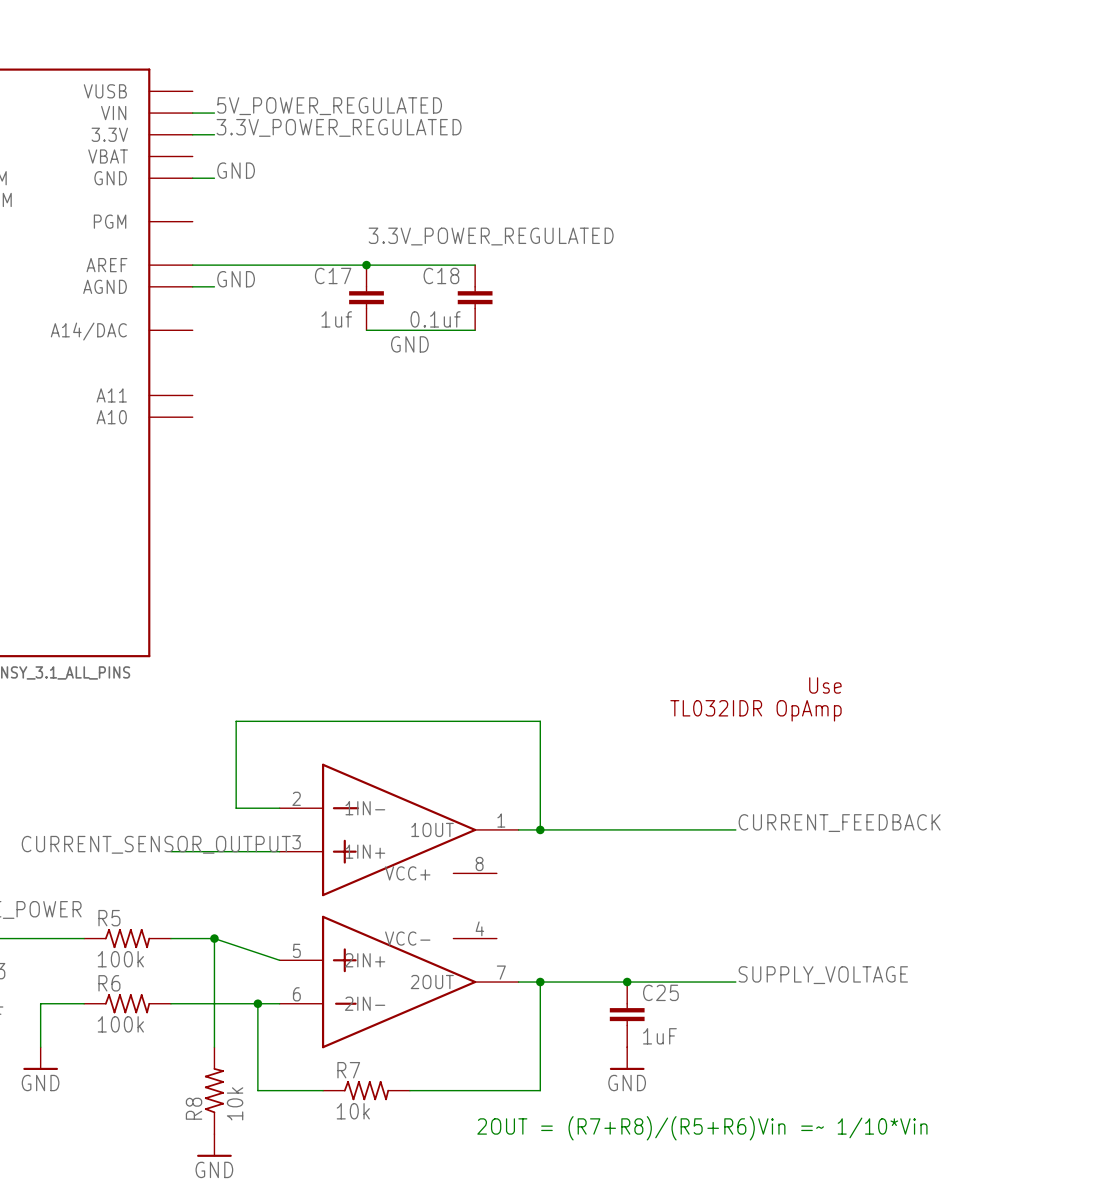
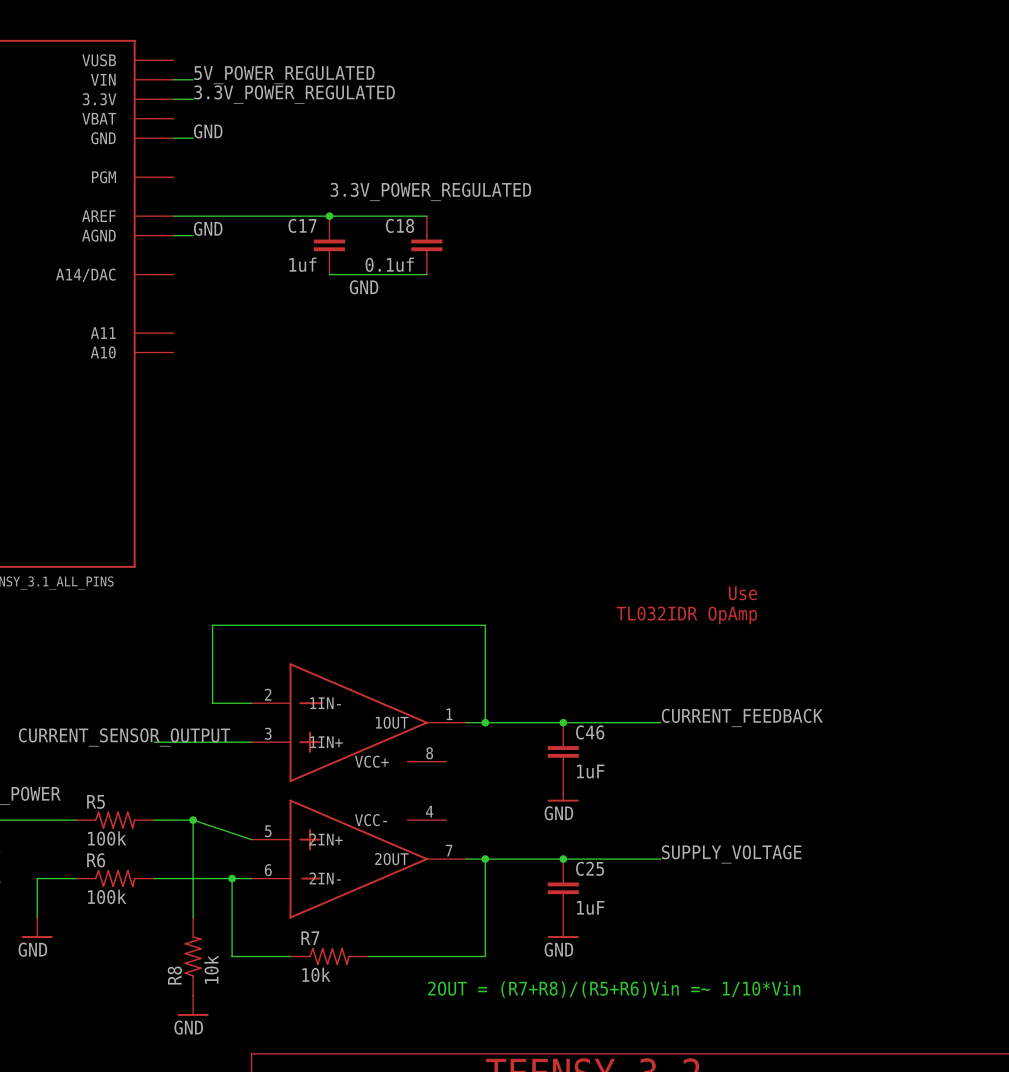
junction: none -> (563, 722)
C46: none -> 1uF (563, 751)
power symbol: none -> GND (563, 791)

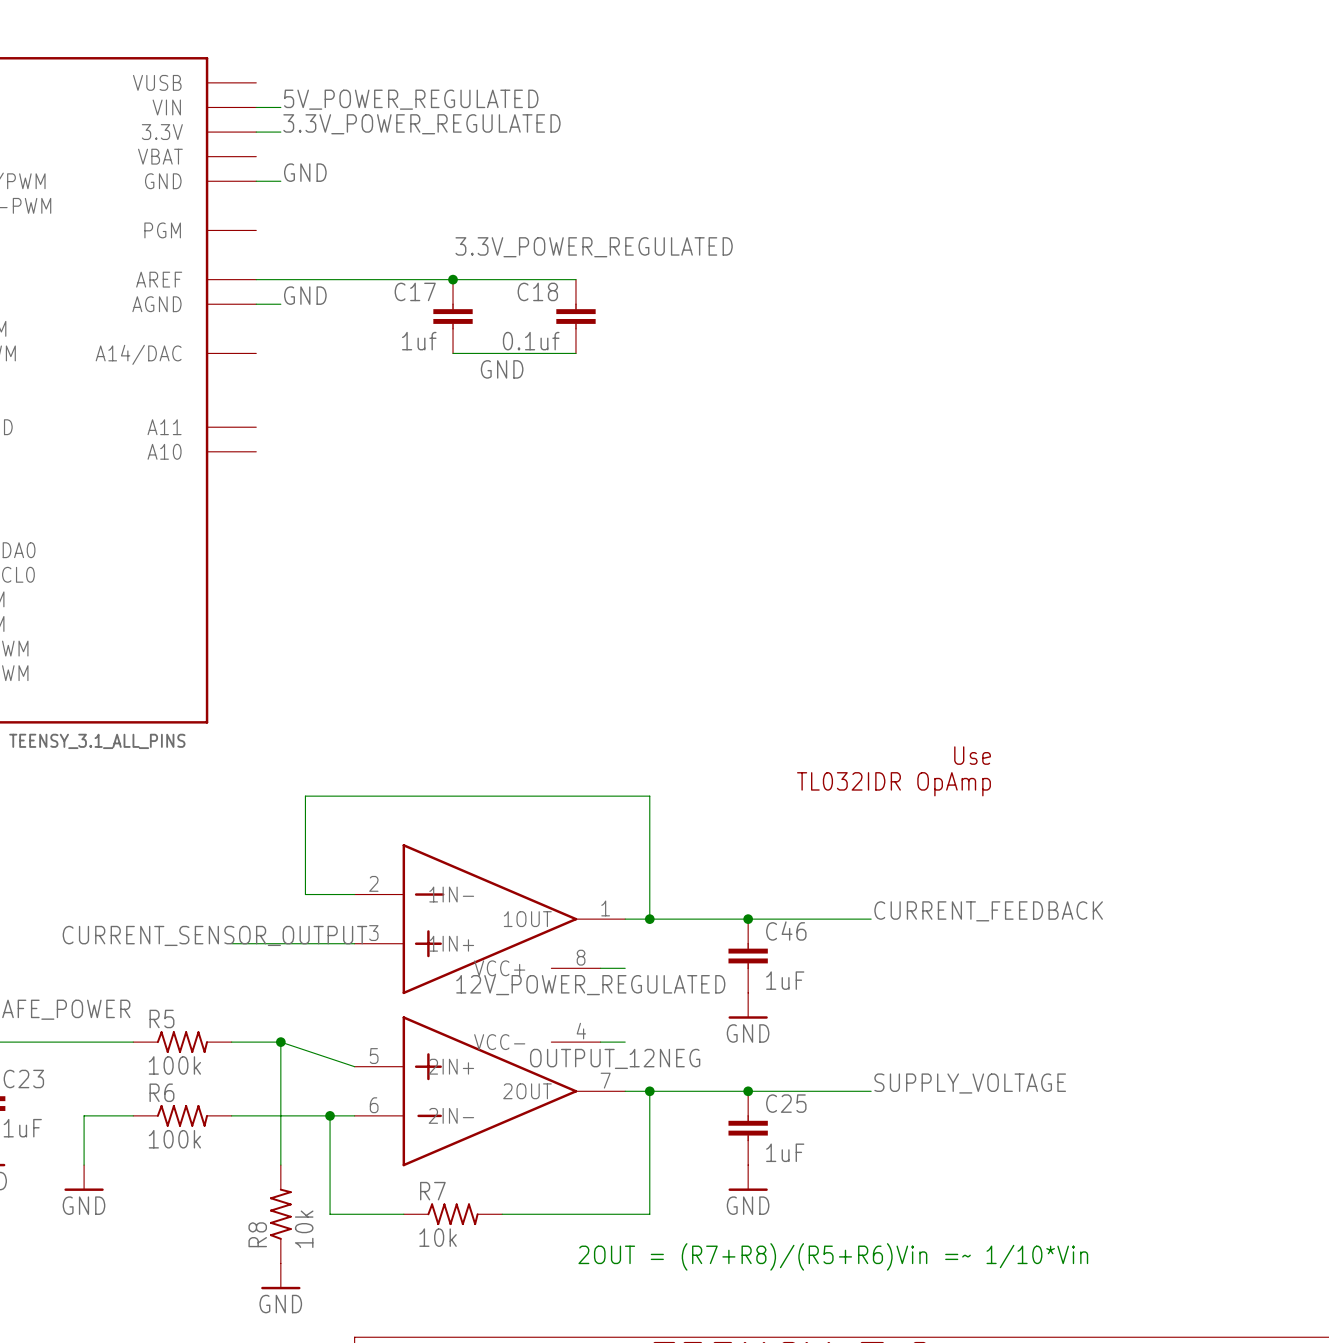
wire: none -> (600, 968) (625, 968)
label: none -> 12V_POWER_REGULATED (590, 985)
wire: none -> (600, 1042) (625, 1042)
label: none -> OUTPUT_12NEG (615, 1058)

